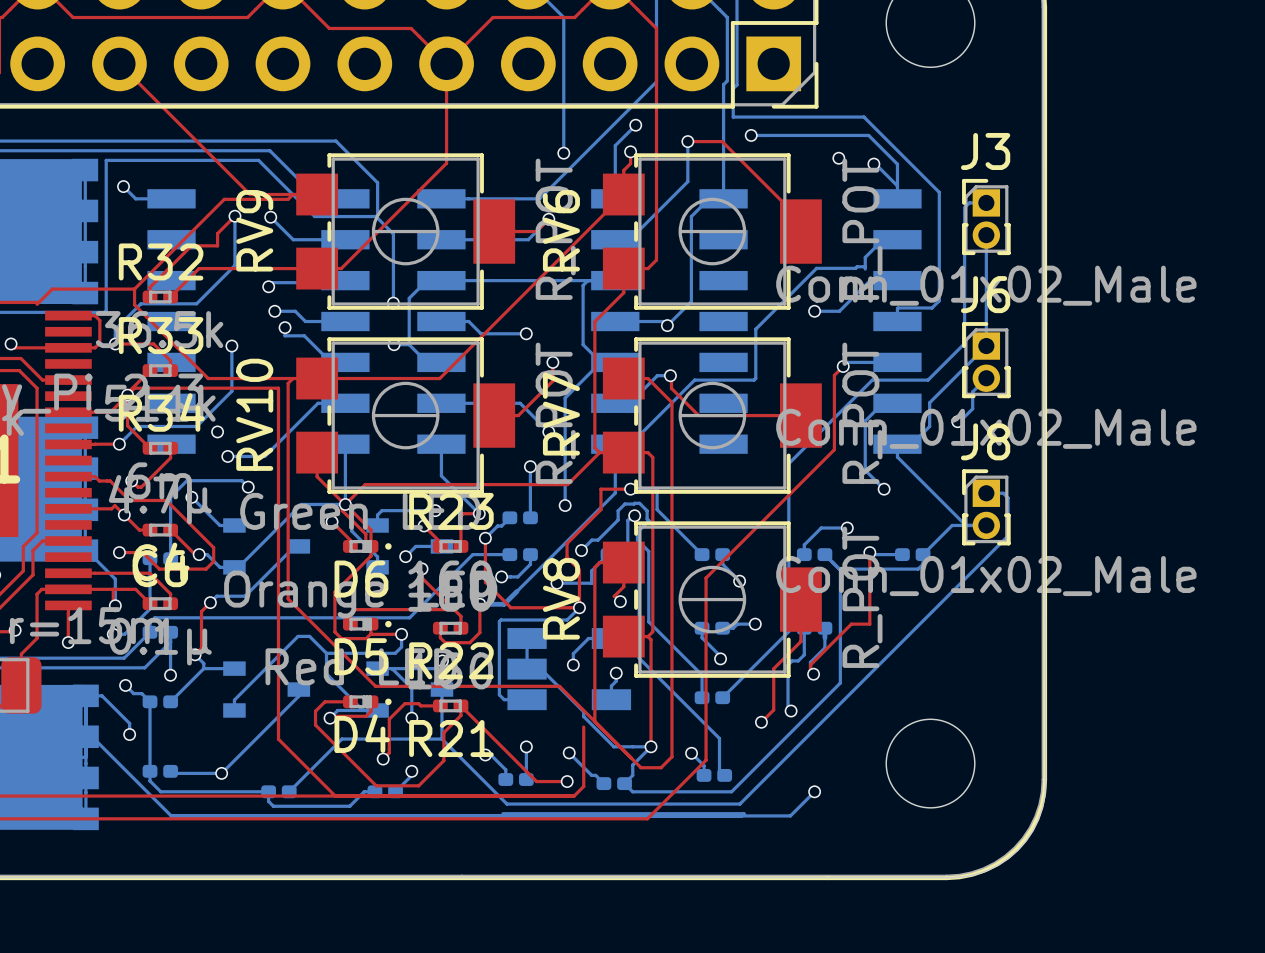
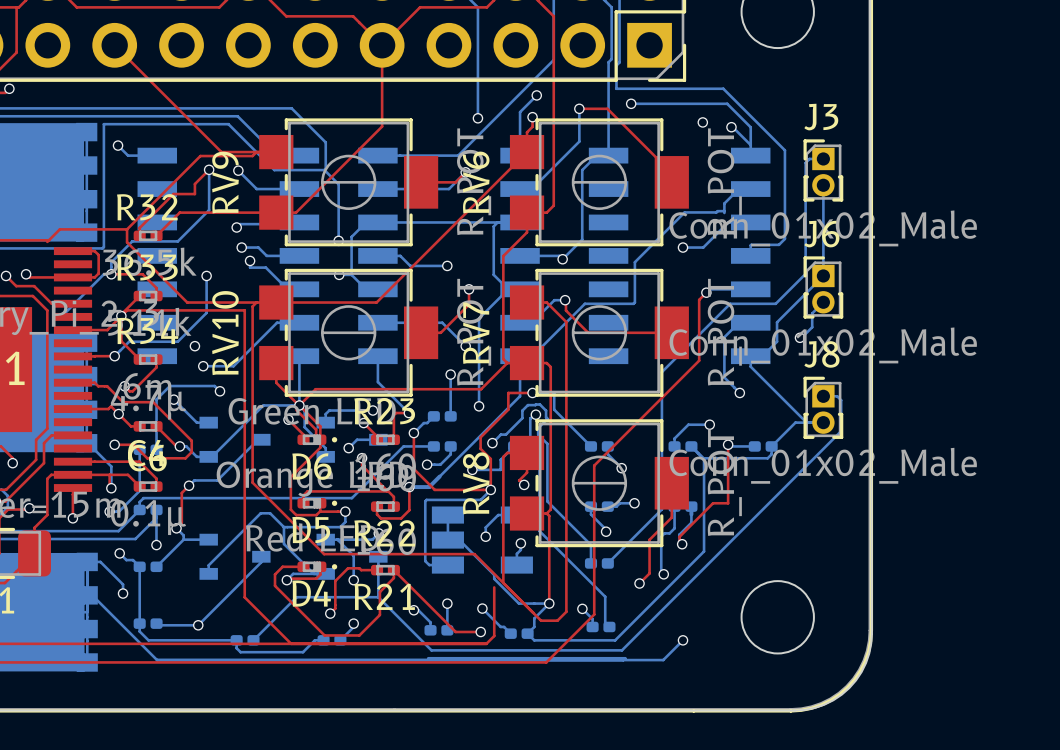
bottom track: none -> (111, 274) (103, 274) (63, 314)

